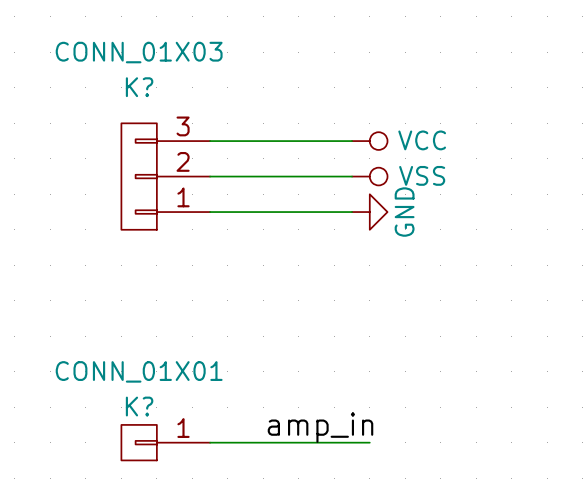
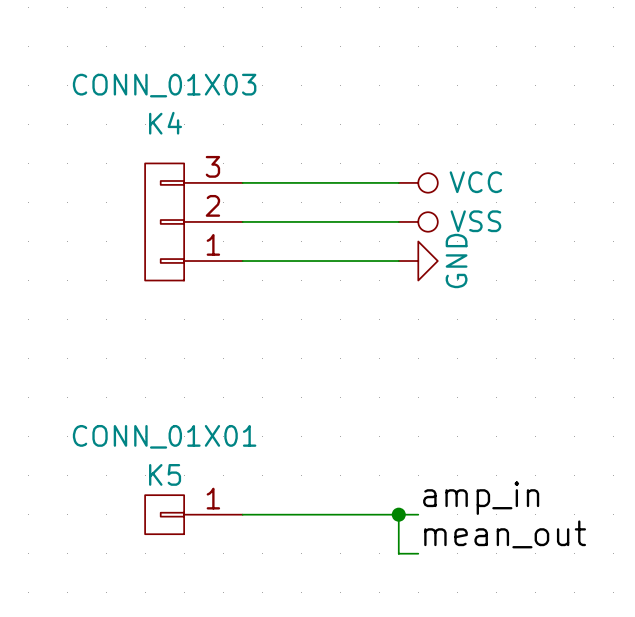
K? name: K? (139, 87) -> K4 (165, 123)
K? name: K? (139, 406) -> K5 (165, 474)
label position: amp_in (320, 427) -> amp_in (481, 498)
wire: none -> (398, 514) (398, 553) (418, 553)
junction: none -> (398, 514)
label: none -> mean_out (505, 534)

